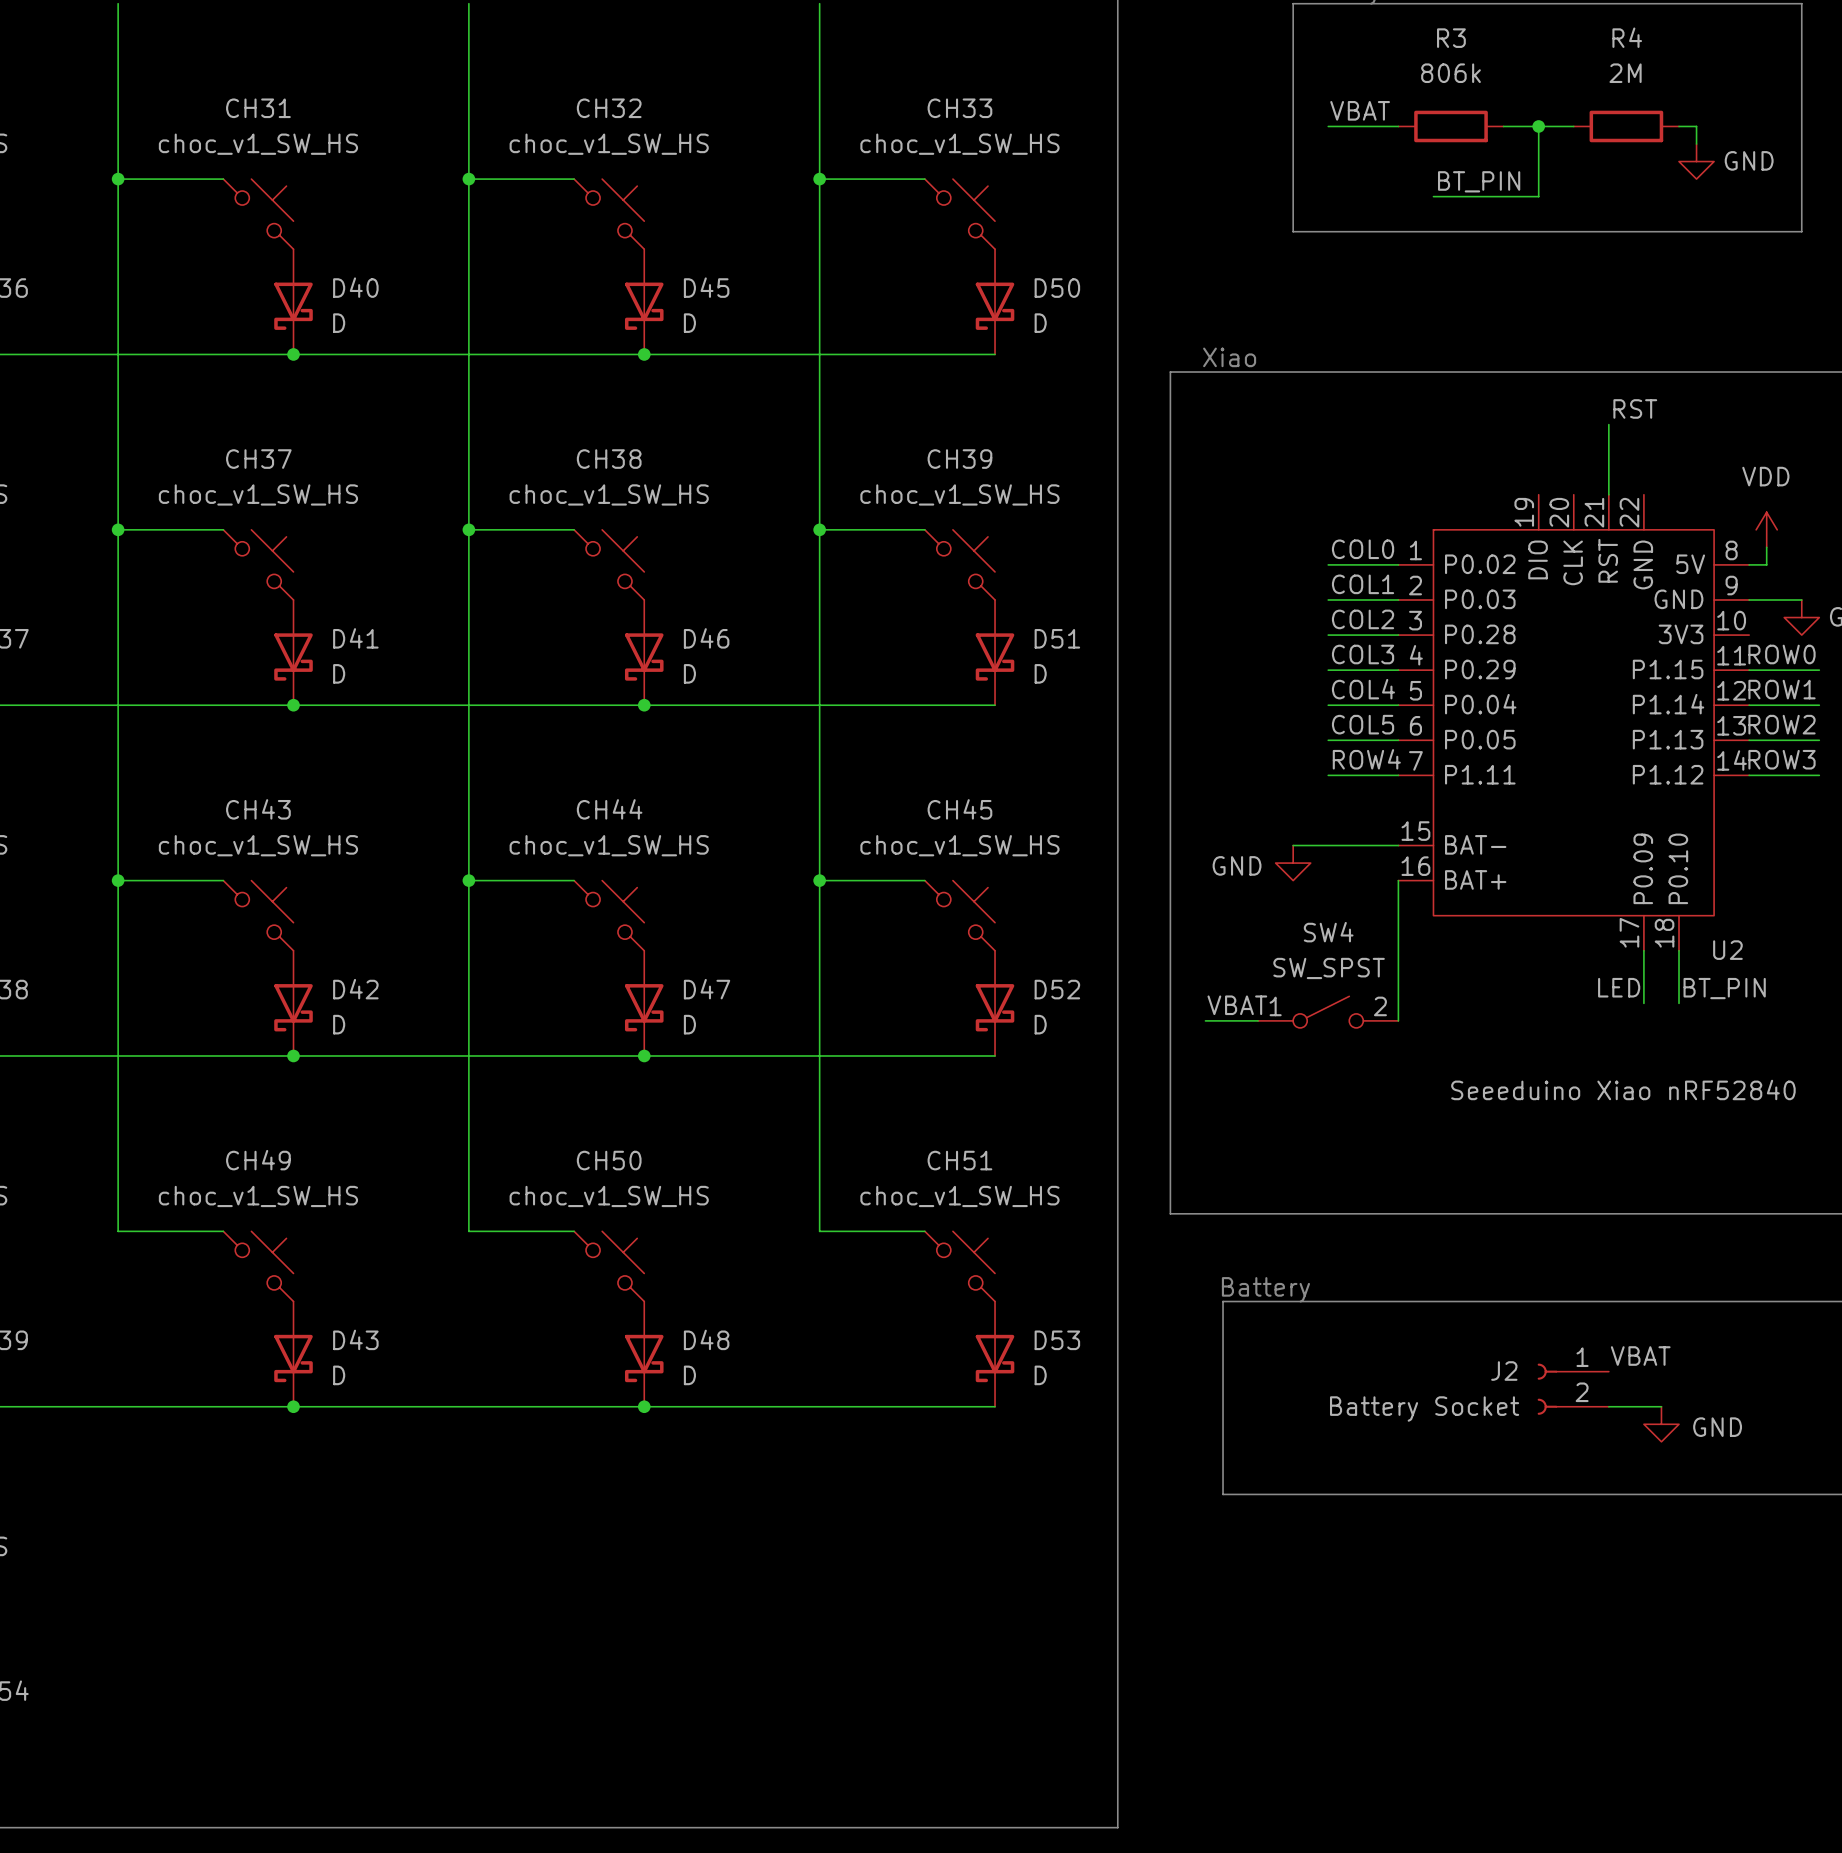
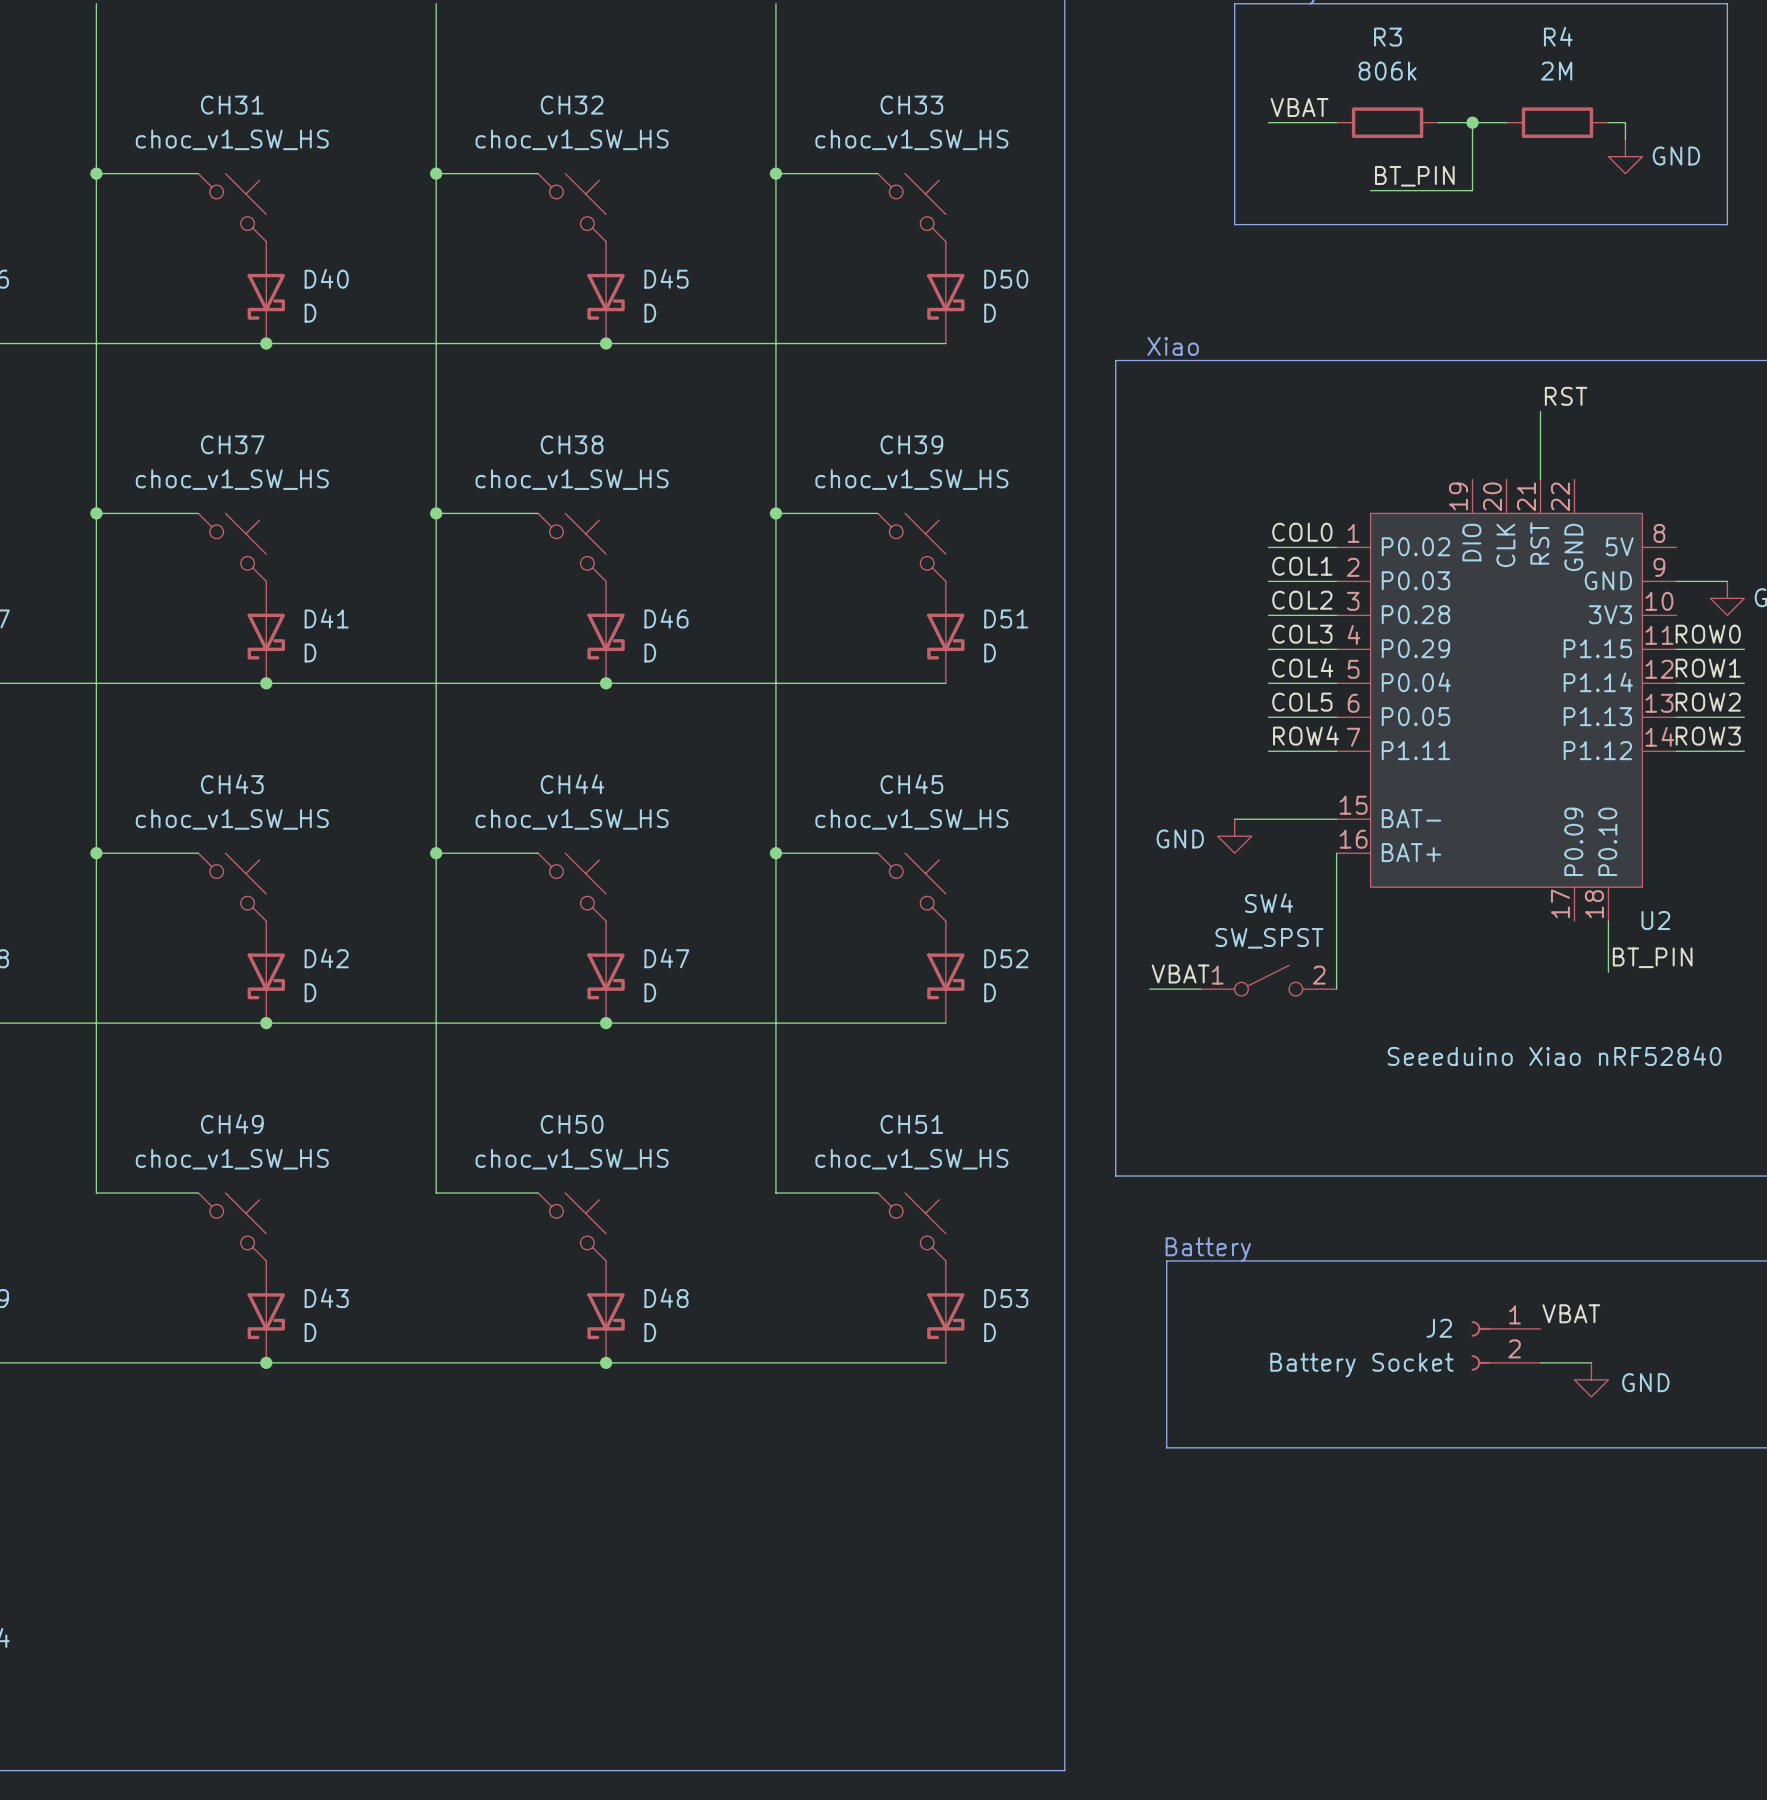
power symbol: VDD (1766, 529) -> none
wire: (1766, 547) (1766, 564) (1749, 564) -> none
wire: (1643, 950) (1643, 1003) -> none
label: LED (1619, 987) -> none

